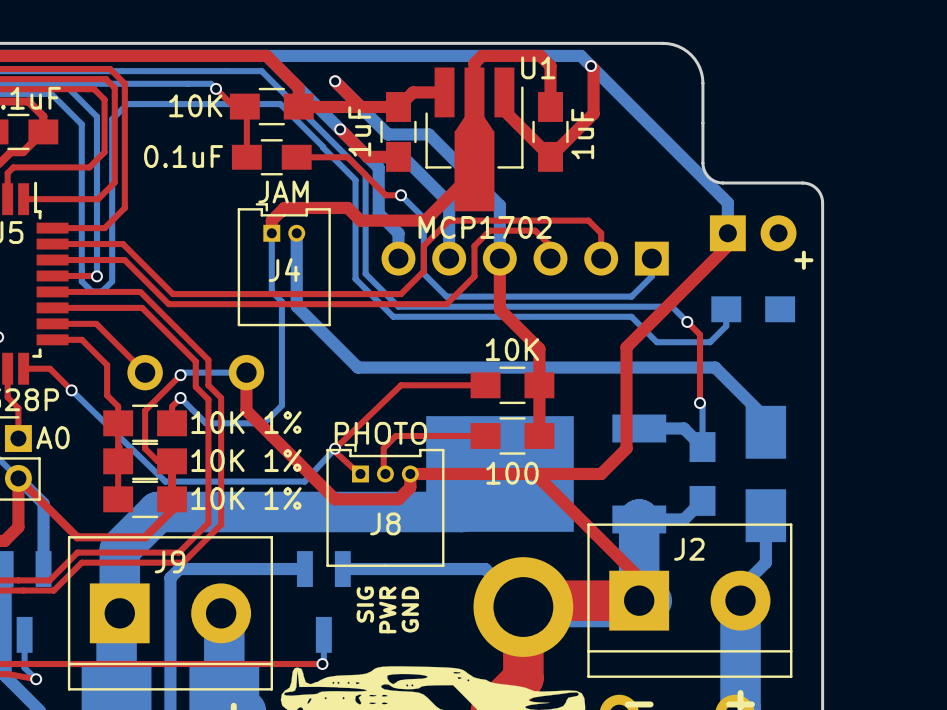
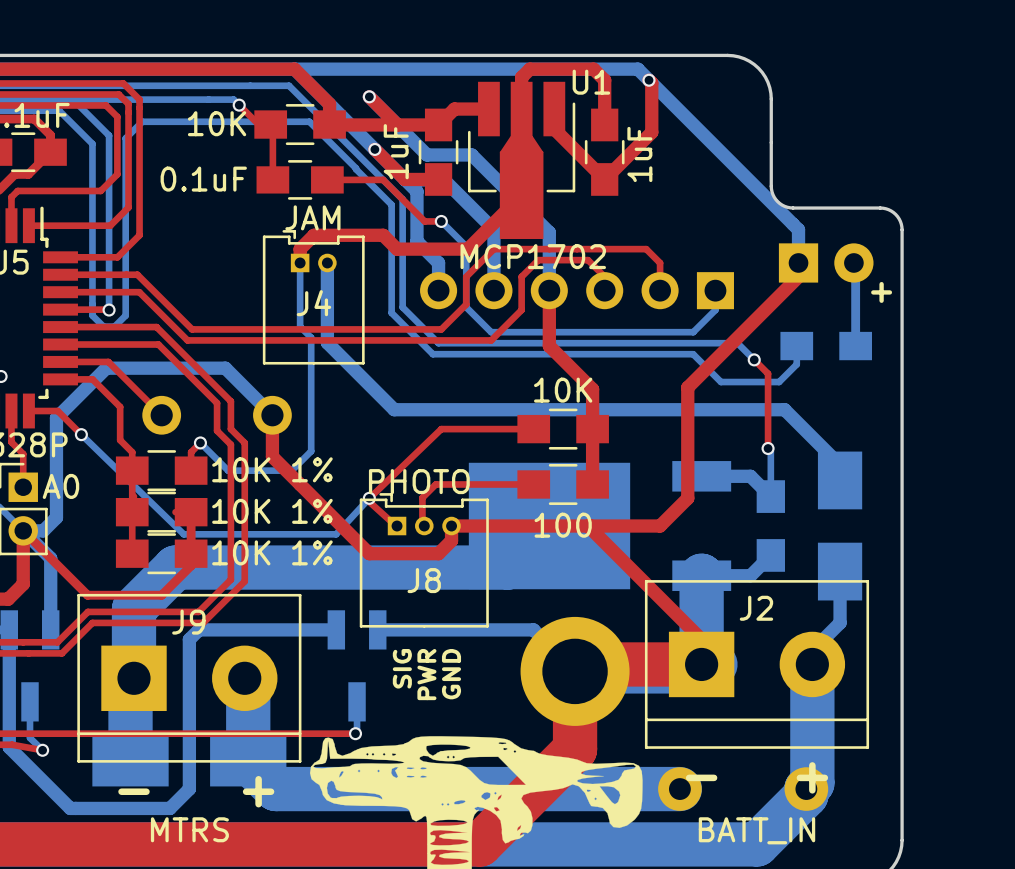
bottom track: none -> (853, 262) (855, 264) (855, 346)
bottom track: (246, 372) (183, 372) (180, 375) -> (272, 415) (225, 368) (106, 368) (56, 418) (56, 517) (43, 530) (23, 530)
top track: (180, 375) (145, 410) (145, 448) (157, 461) -> none
via: (180, 375) -> none

